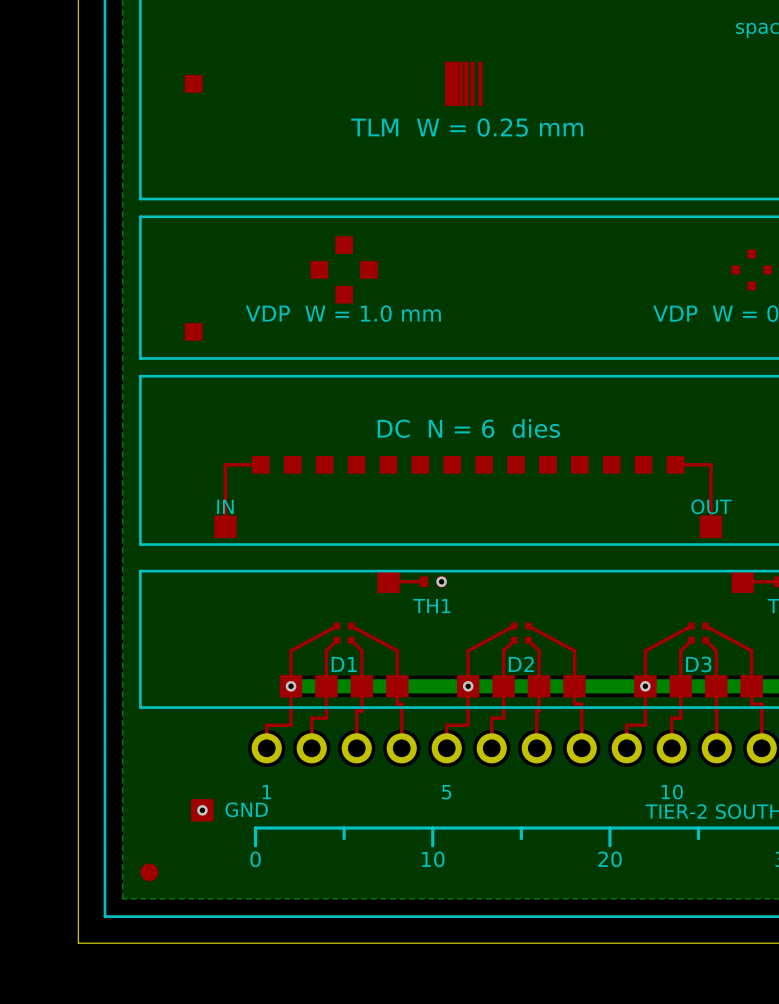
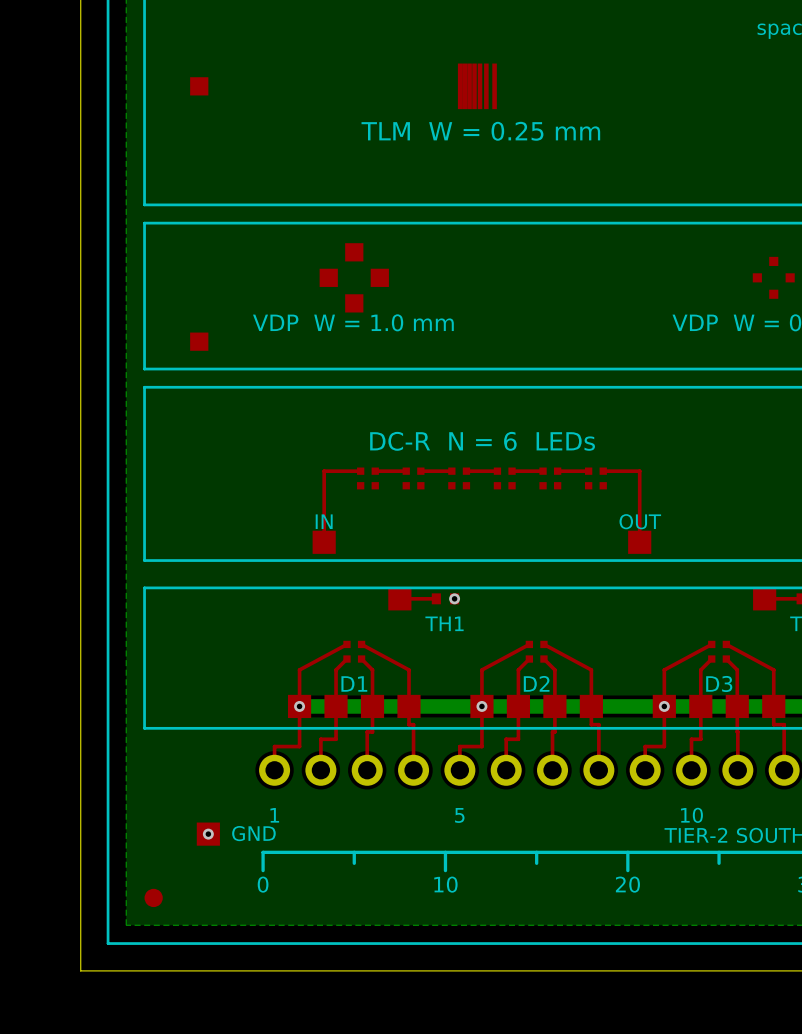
text: DC N = 6 dies (468, 428) -> DC-R N = 6 LEDs (482, 441)
top track: none -> (360, 471) (324, 471) (324, 542)
top track: none -> (375, 471) (406, 471)
top track: none -> (420, 471) (451, 471)
top track: none -> (466, 471) (497, 471)
top track: none -> (512, 471) (543, 471)
top track: none -> (557, 471) (588, 471)
top track: none -> (603, 471) (639, 471) (639, 542)
top track: (260, 464) (225, 464) (225, 526) -> none
part: none -> (367, 478)
part: none -> (413, 478)
part: none -> (459, 478)
part: (468, 464) -> none
part: none -> (504, 478)
part: none -> (550, 478)
part: none -> (595, 478)
top track: (675, 464) (710, 464) (710, 526) -> none
text position: IN (225, 506) -> IN (324, 521)
text position: OUT (711, 506) -> OUT (640, 521)
part position: (225, 526) -> (324, 542)
part position: (710, 526) -> (639, 542)

